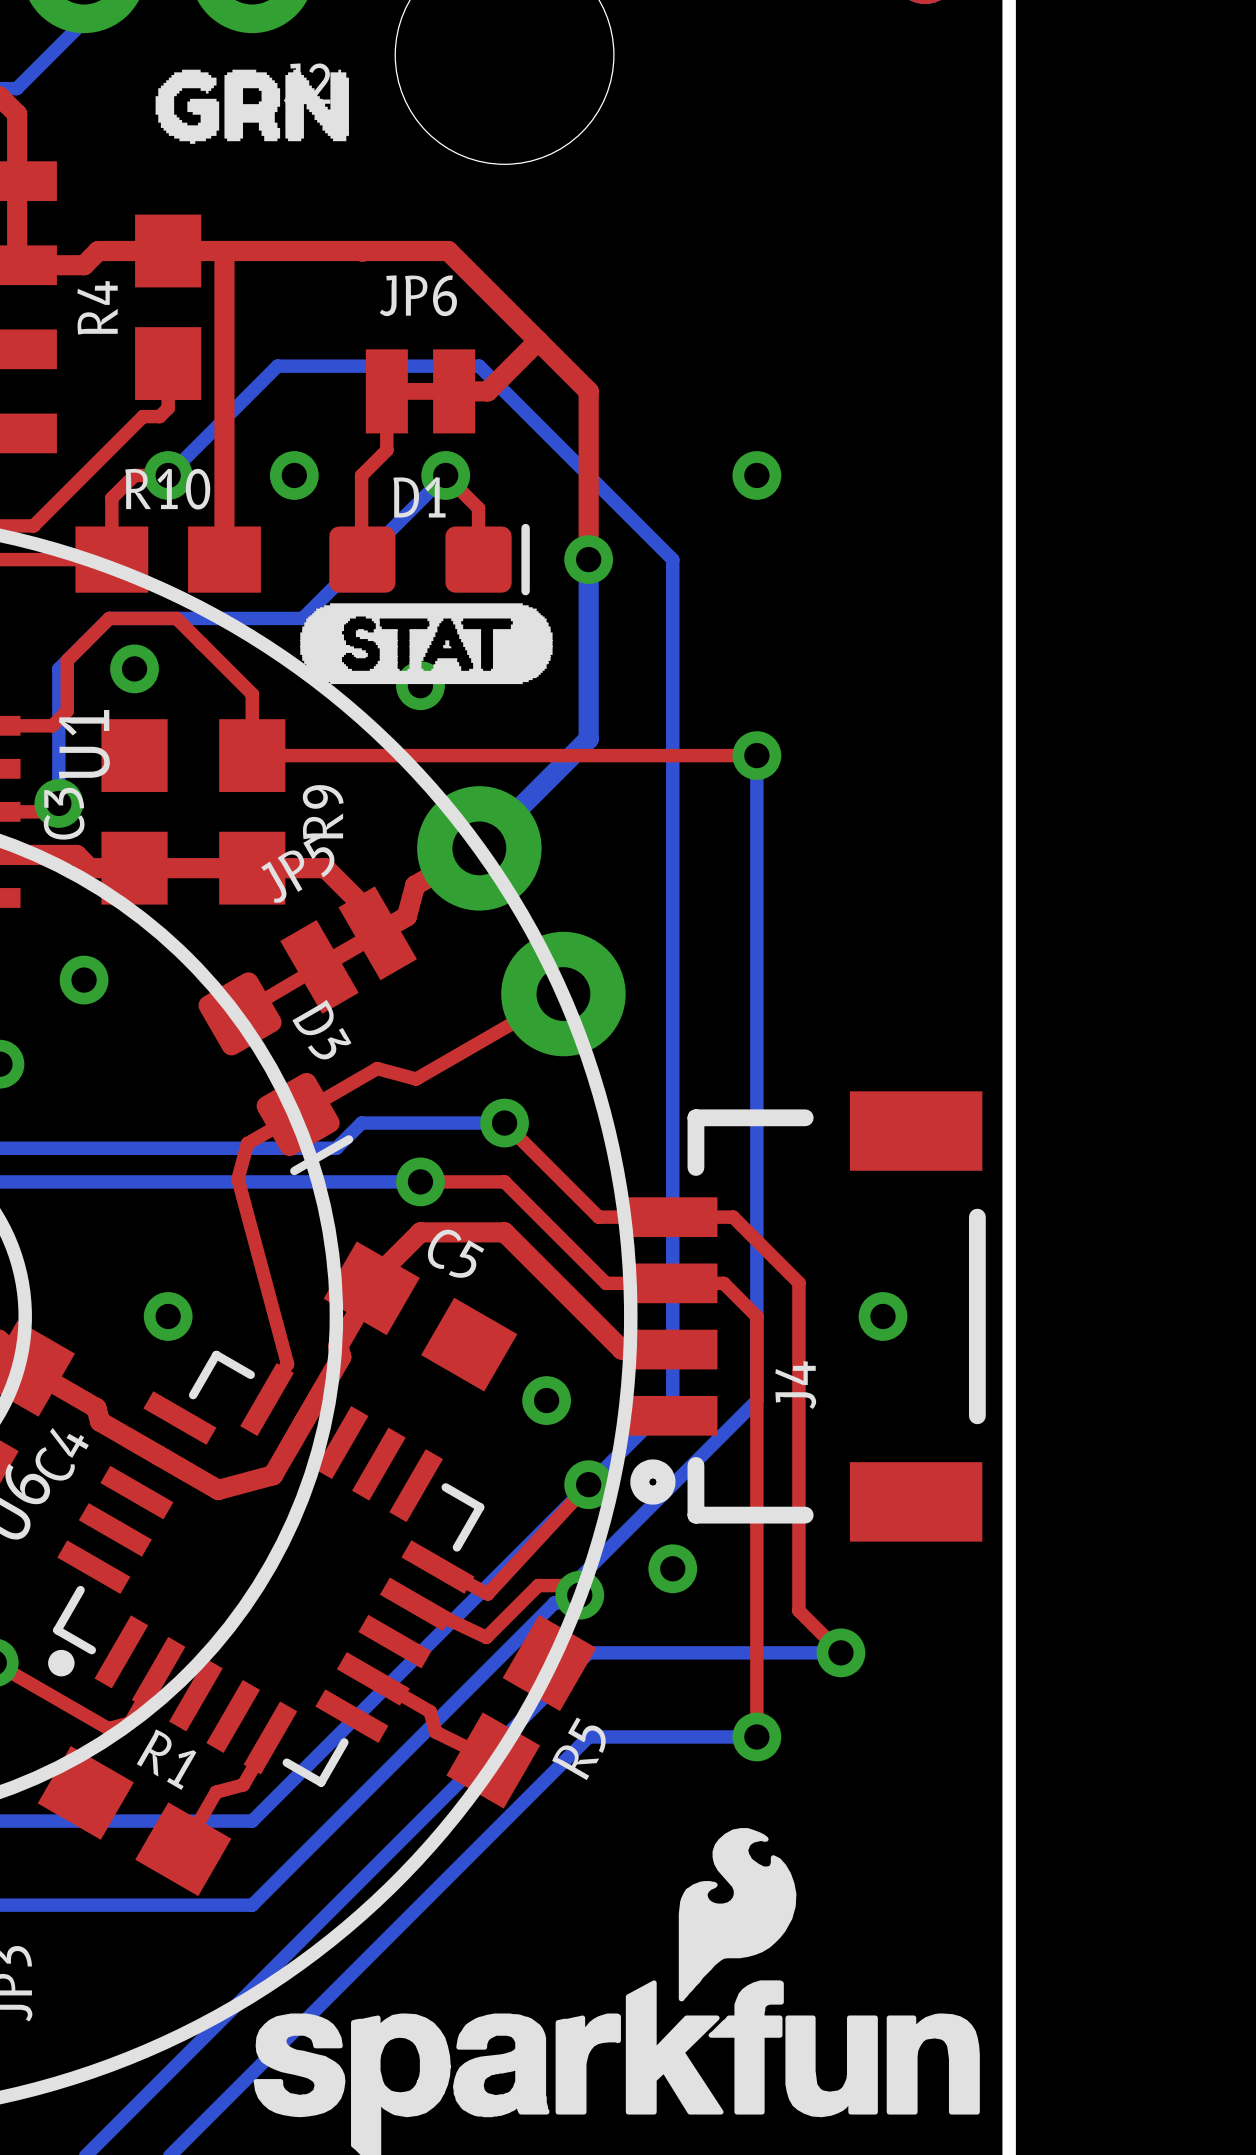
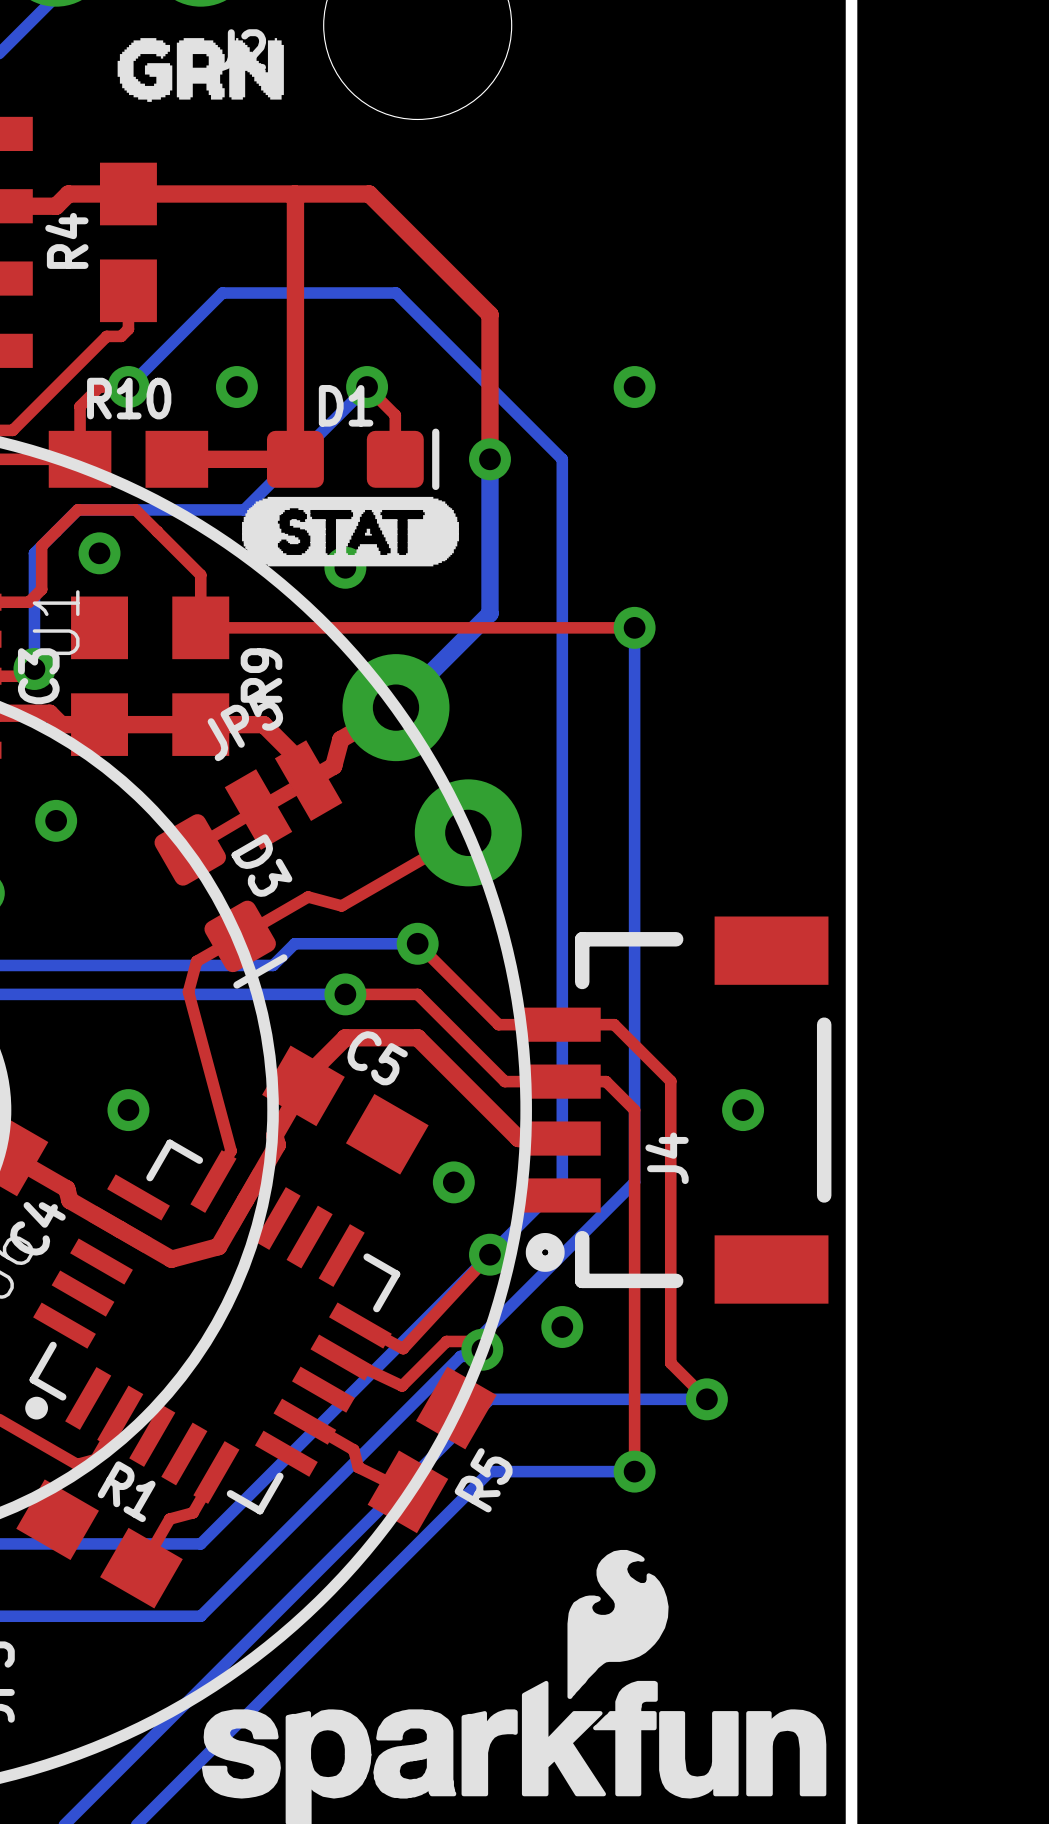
top track: (227, 251) (224, 253) (224, 559) -> (295, 194) (295, 459) (176, 459)
top track: (538, 340) (487, 391) (454, 391) -> none
top track: (386, 391) (386, 450) (361, 475) (361, 558) -> none
JP6: (420, 391) -> none

